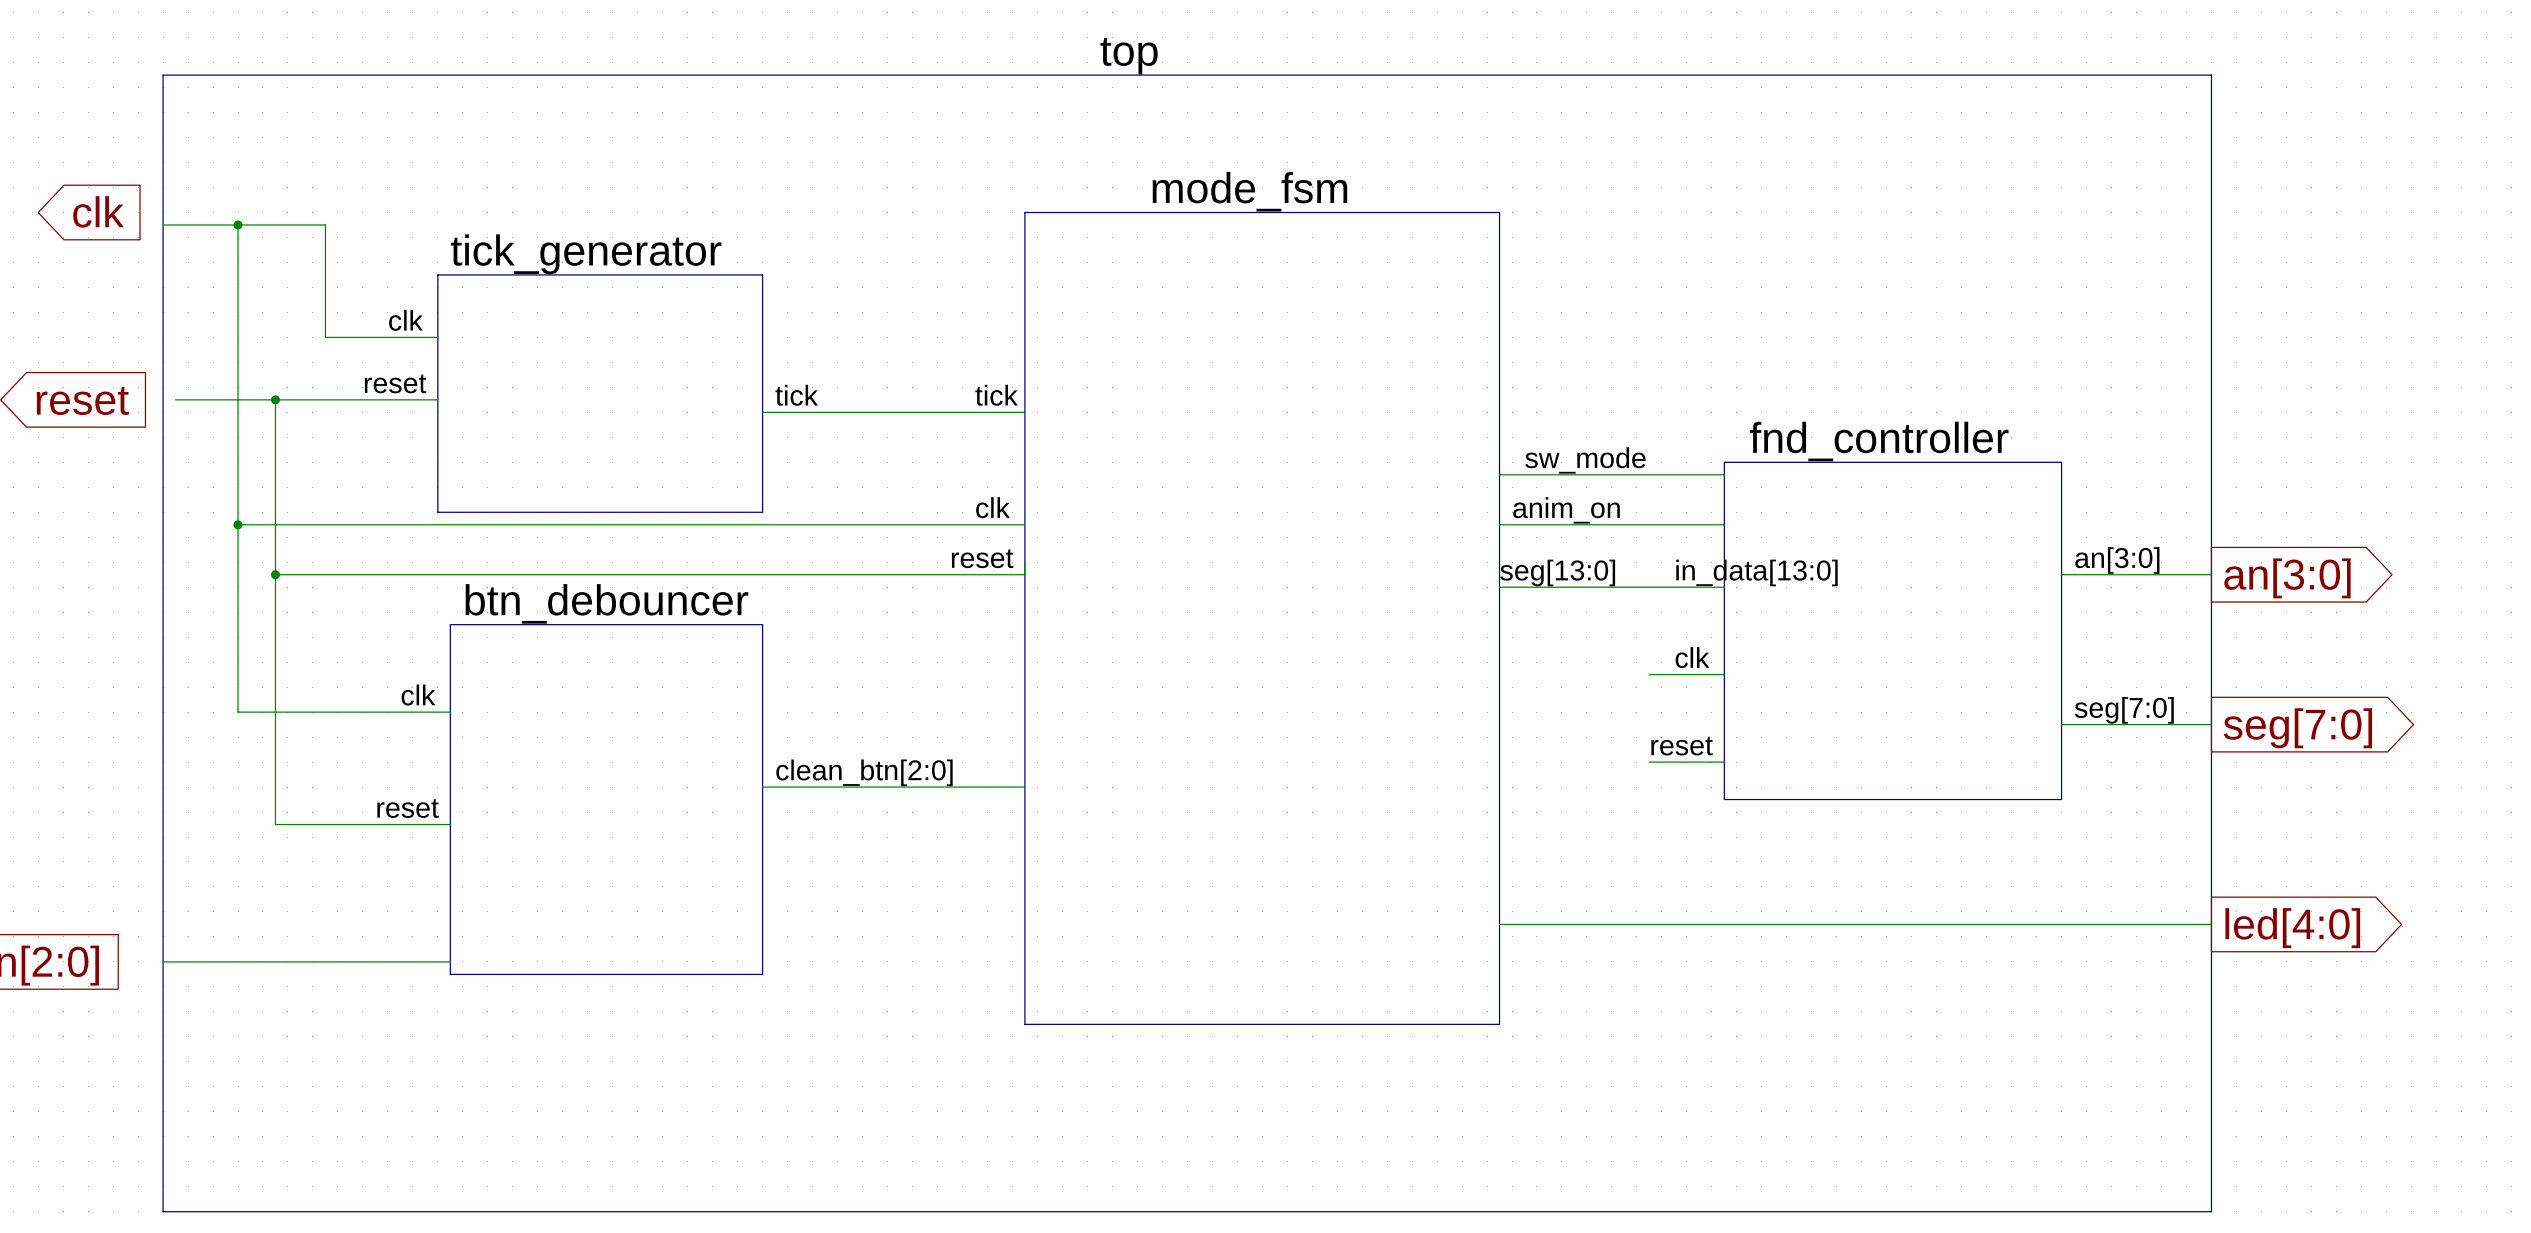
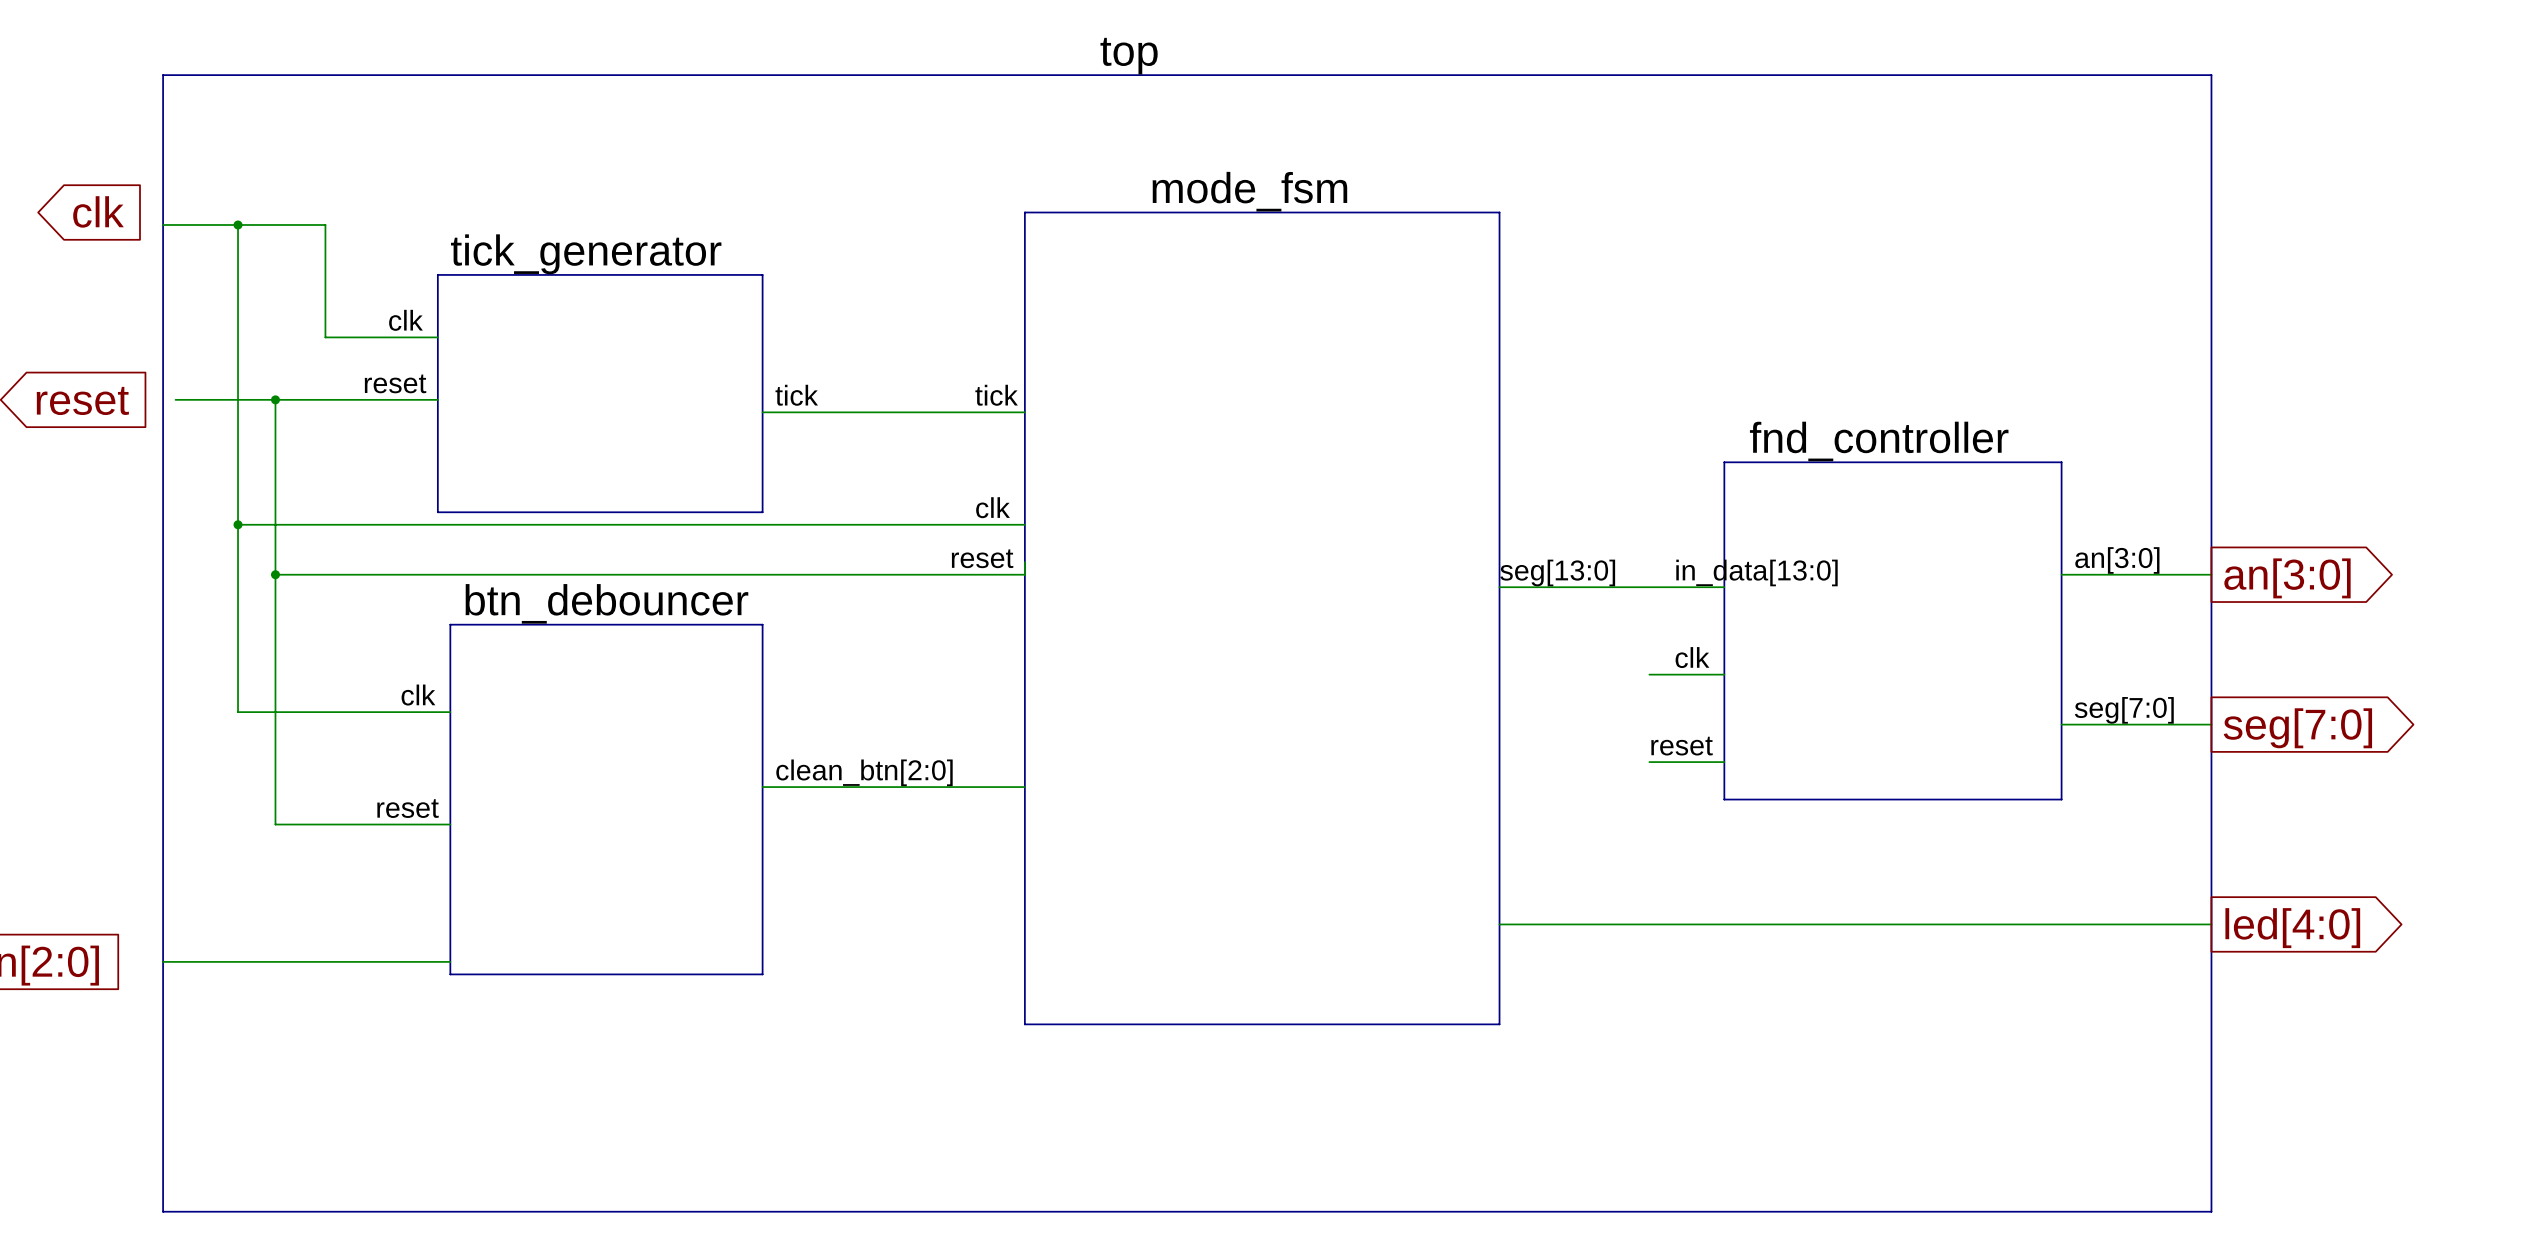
label: sw_mode (1585, 460) -> none
wire: (1499, 474) (1724, 474) -> none
label: anim_on (1566, 510) -> none
wire: (1499, 524) (1724, 524) -> none

